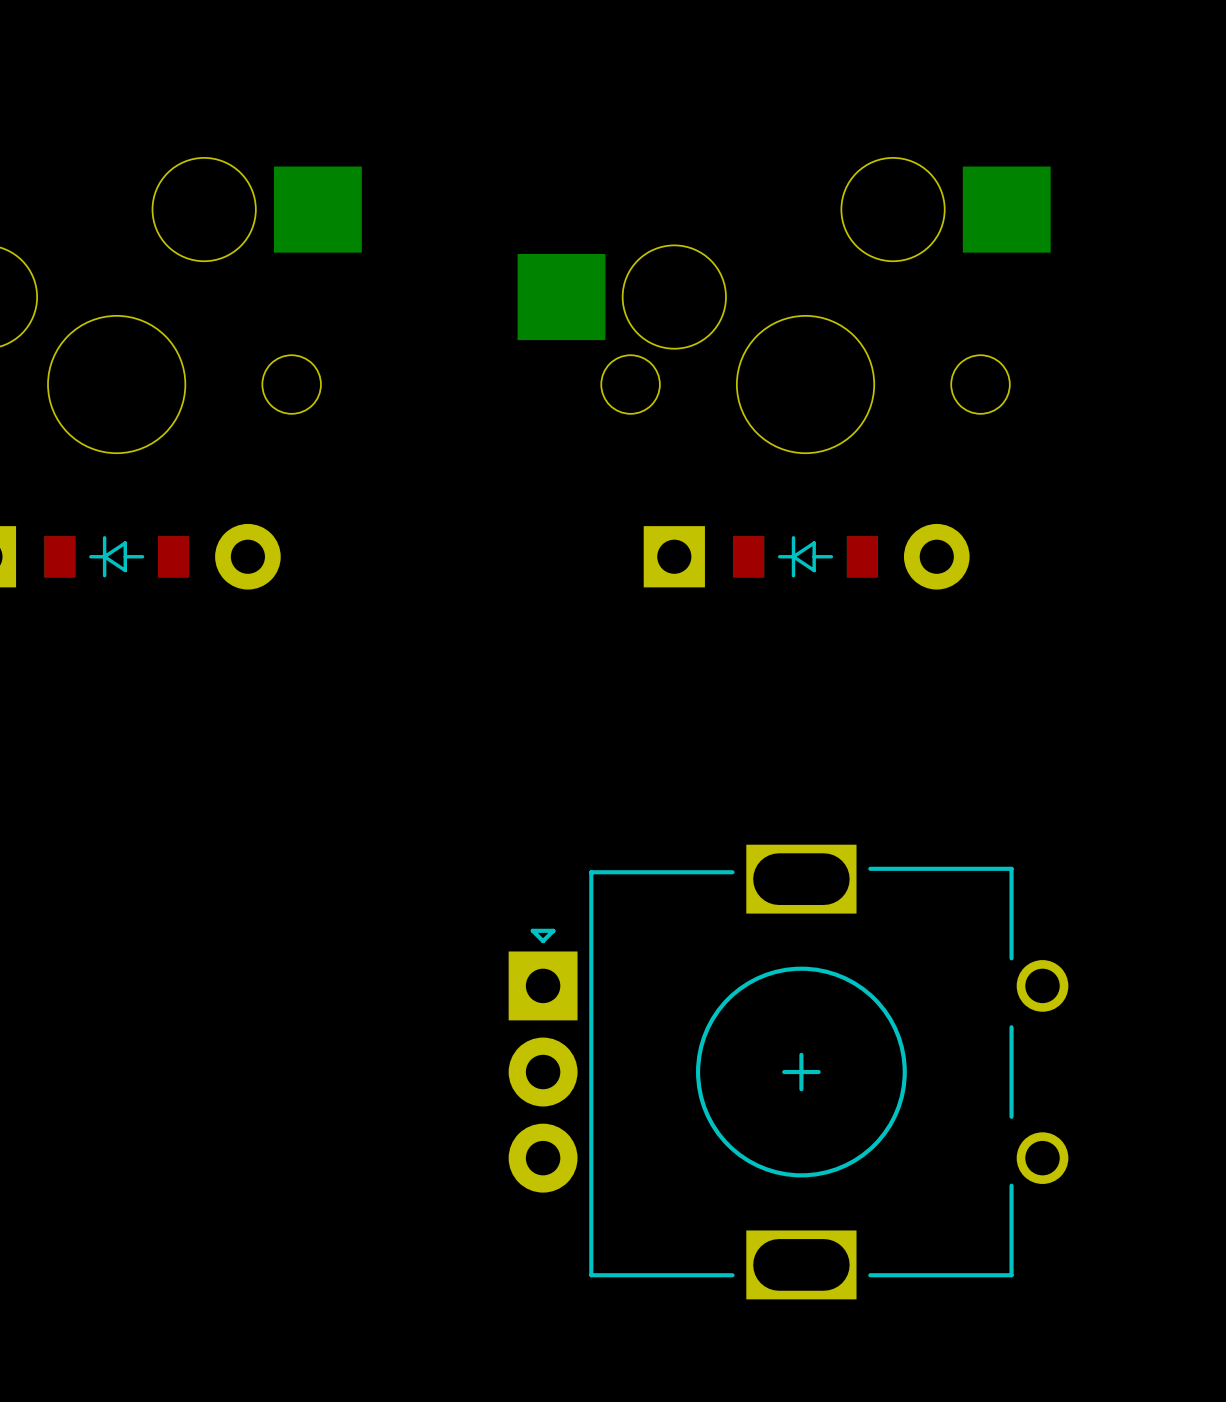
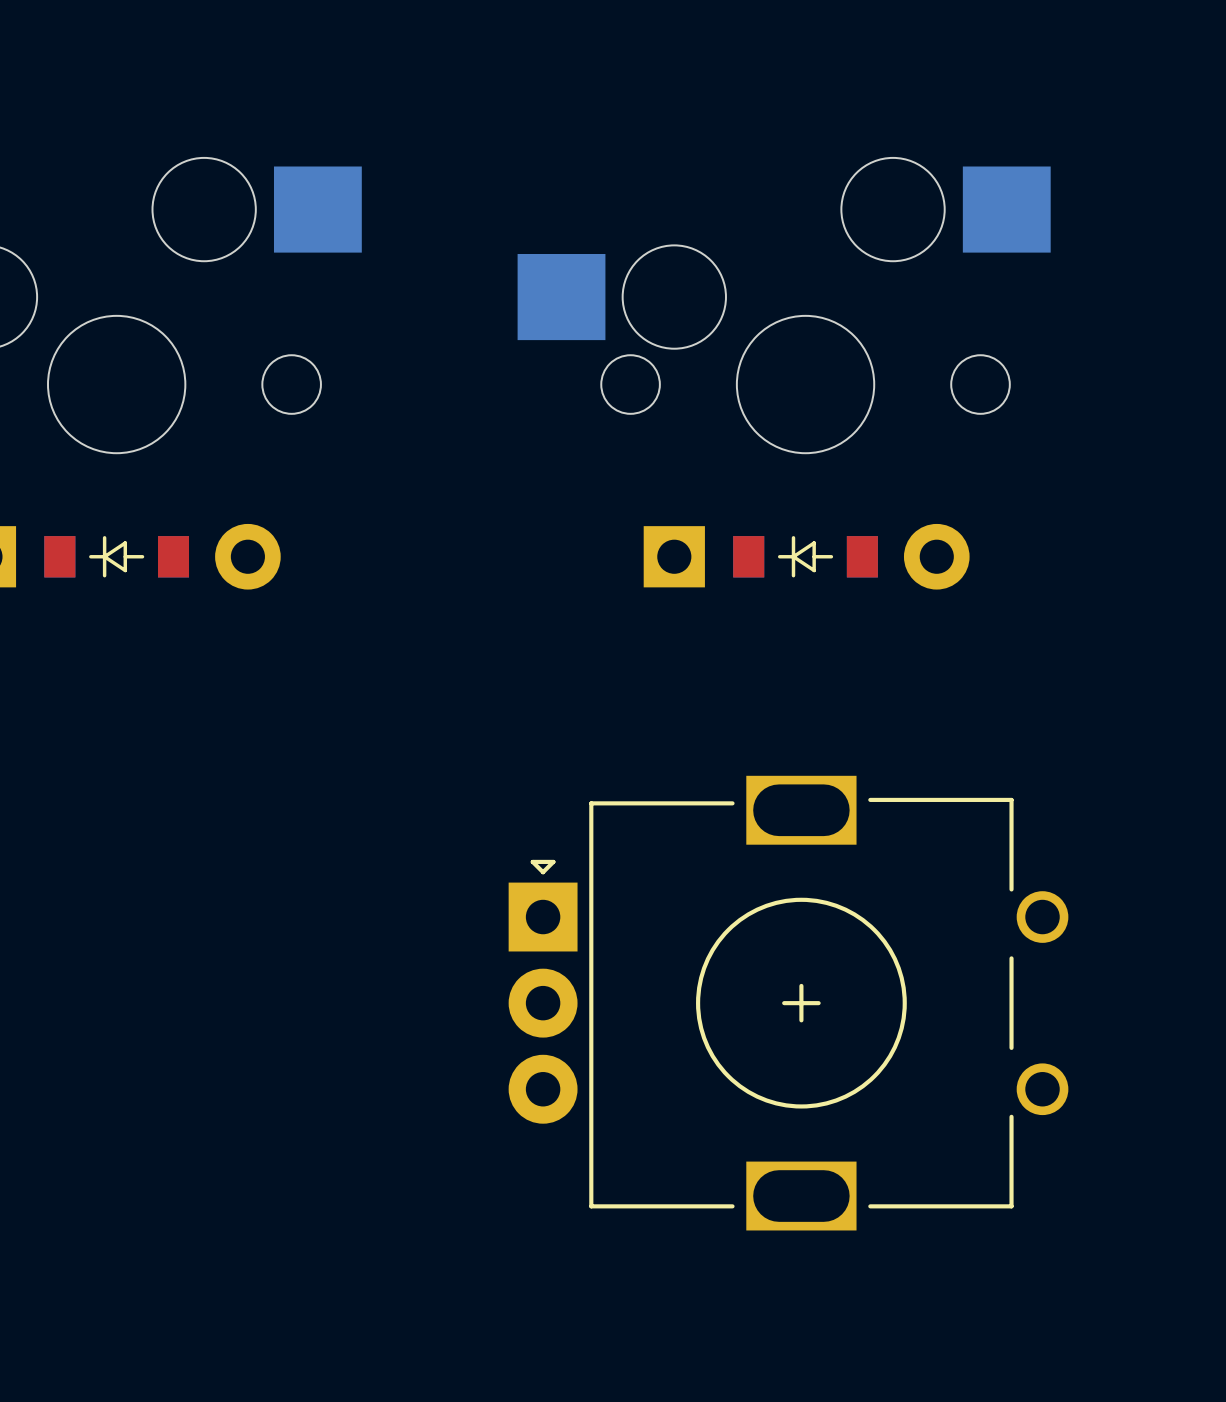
part position: (788, 1072) -> (788, 1003)

